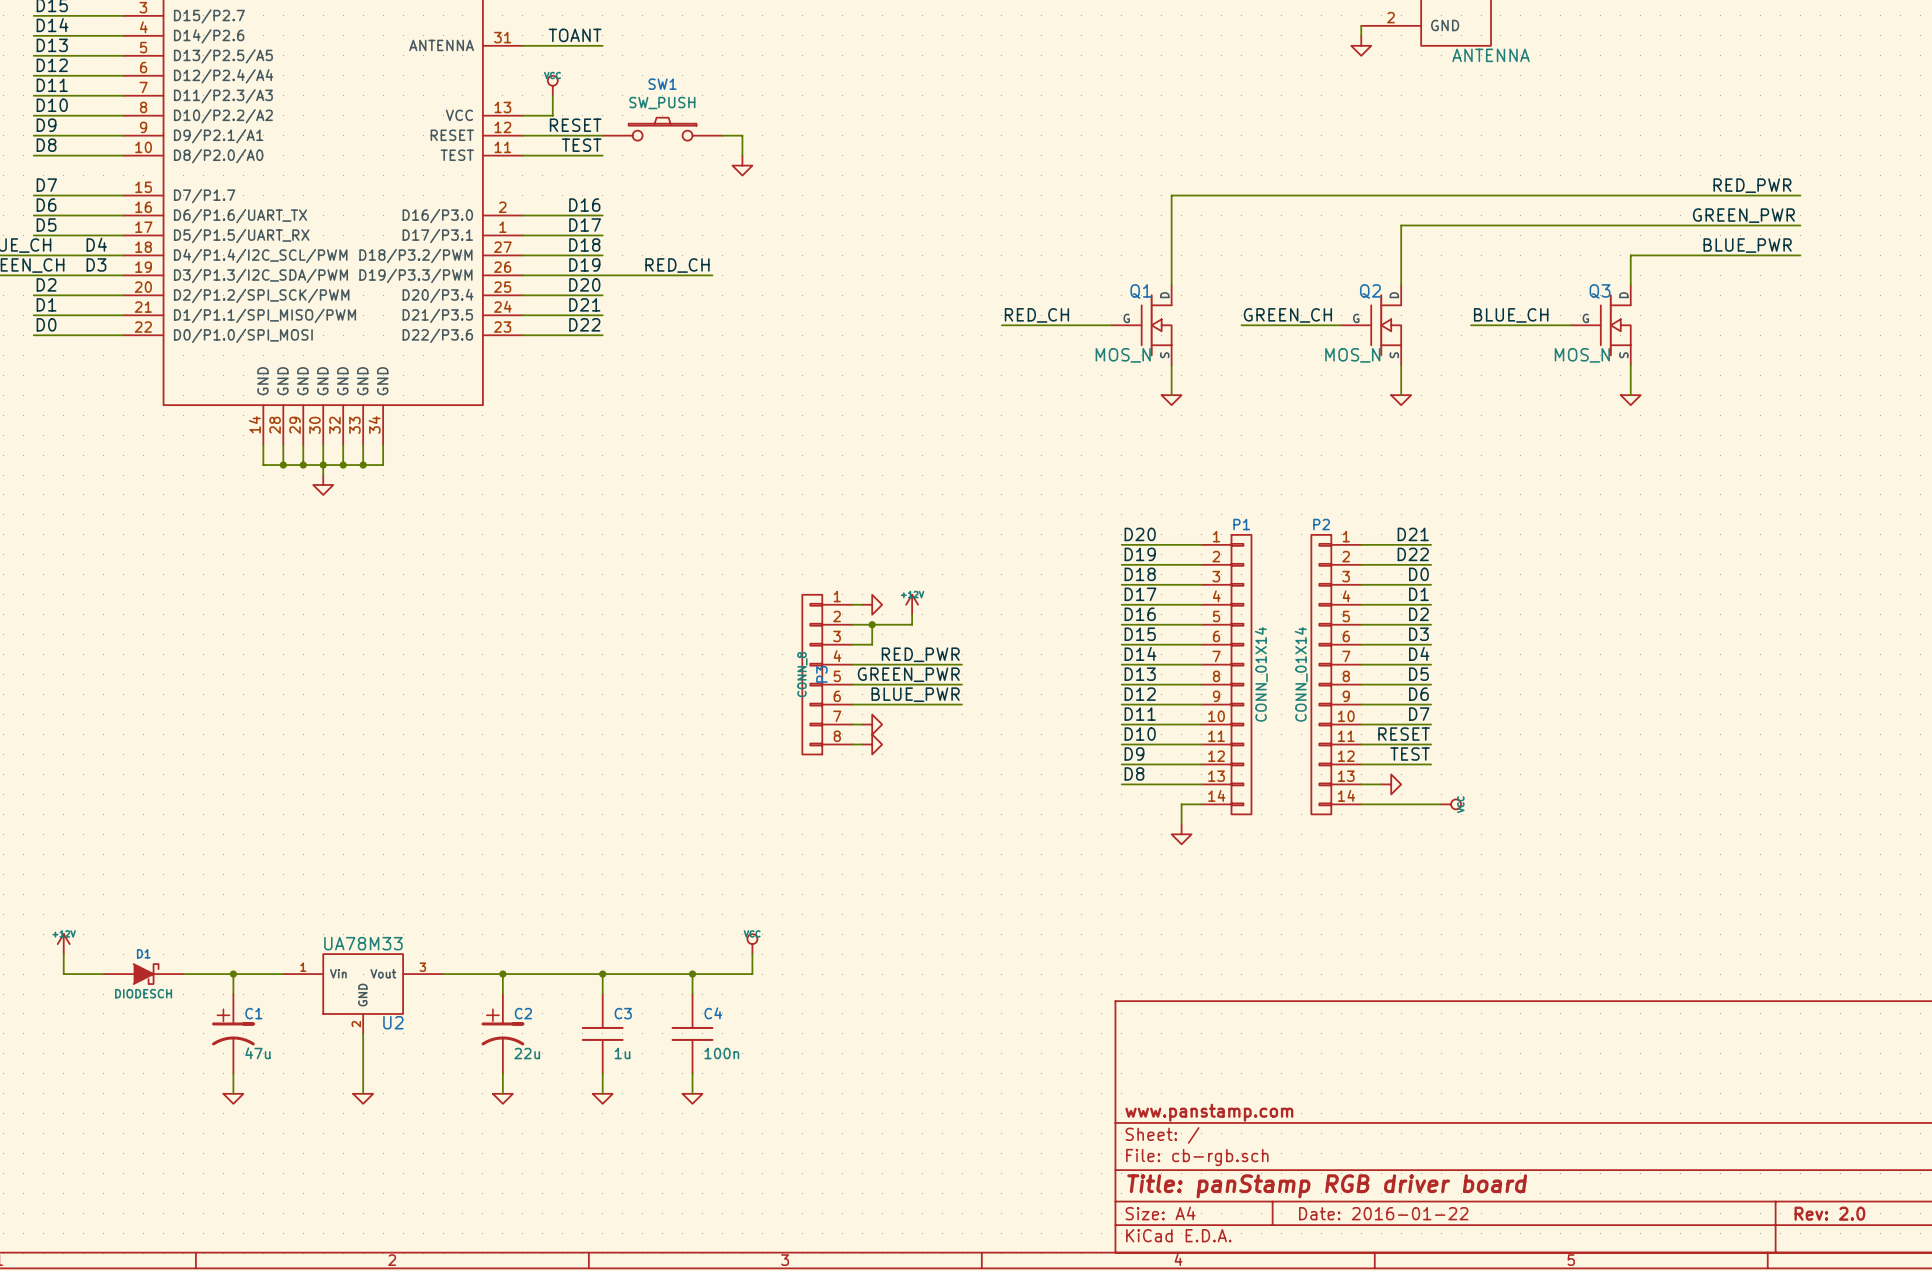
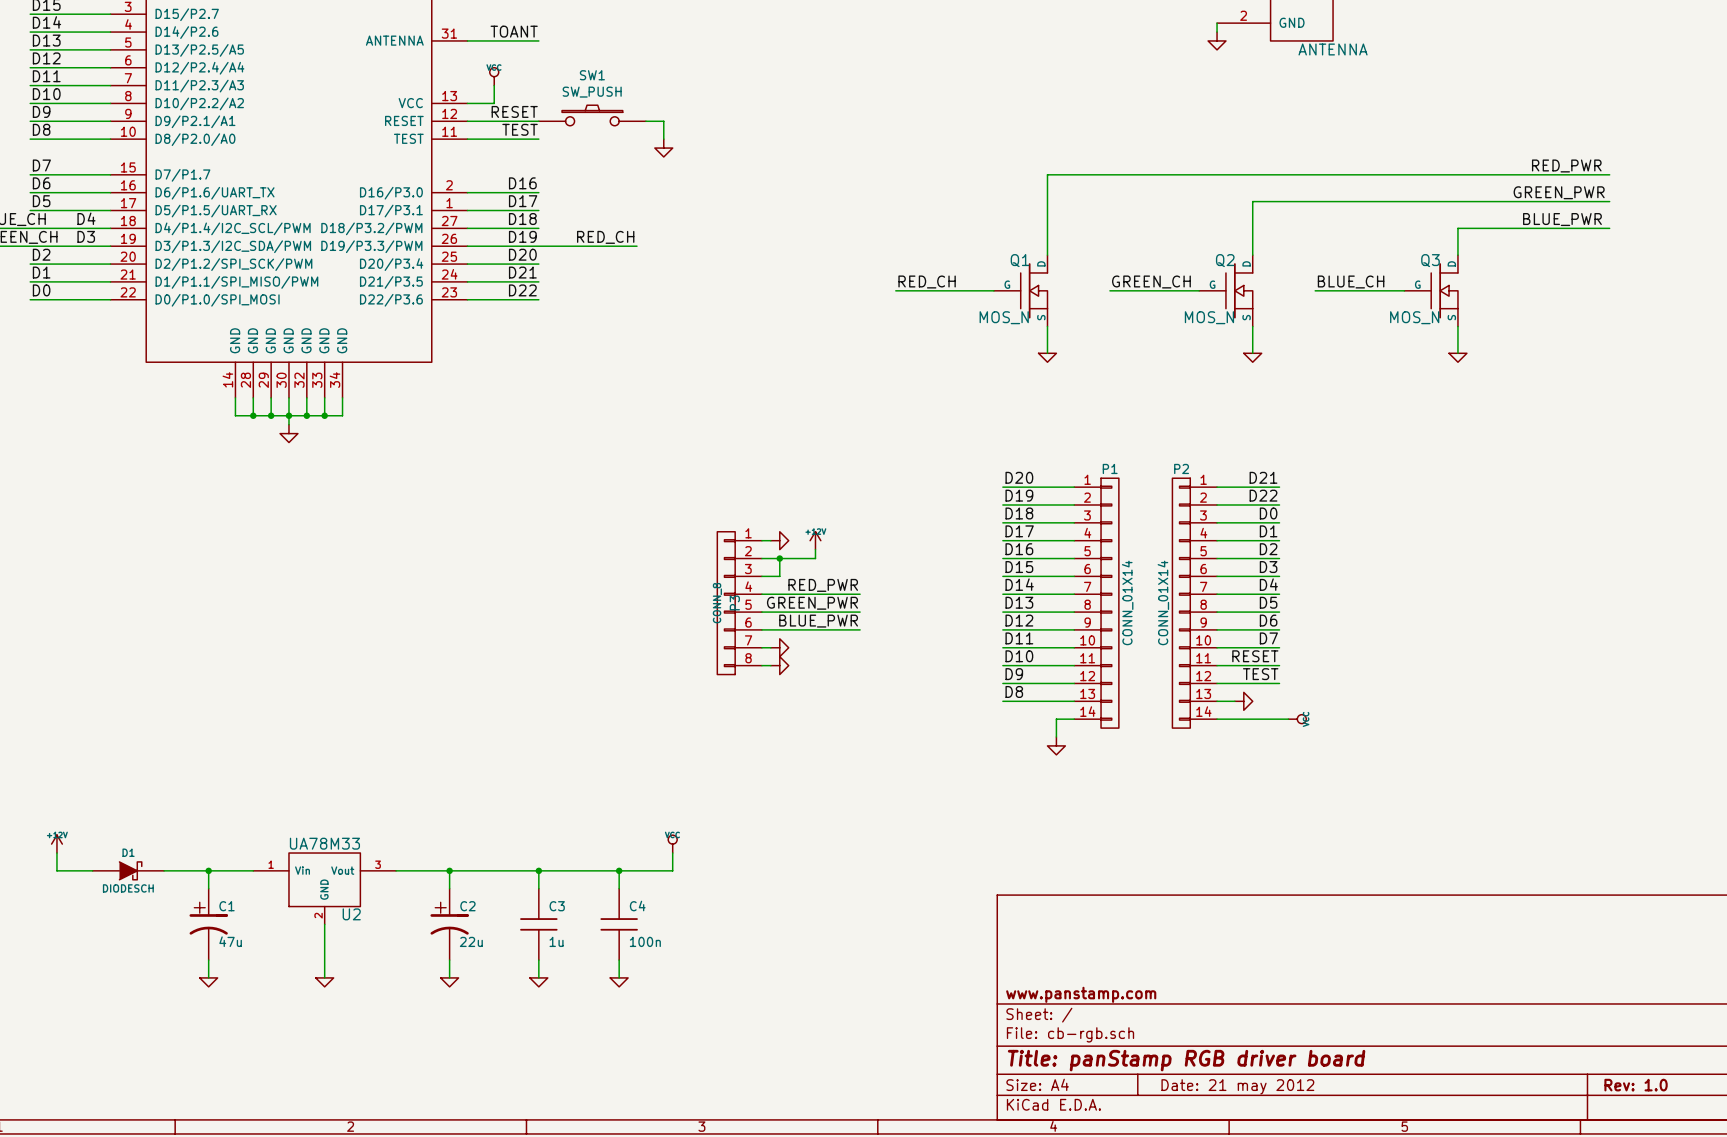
title block: Date: 2016-01-22 (1383, 1213) -> Date: 21 may 2012 (1237, 1086)
title block: Rev: 2.0 (1829, 1213) -> Rev: 1.0 (1636, 1085)

